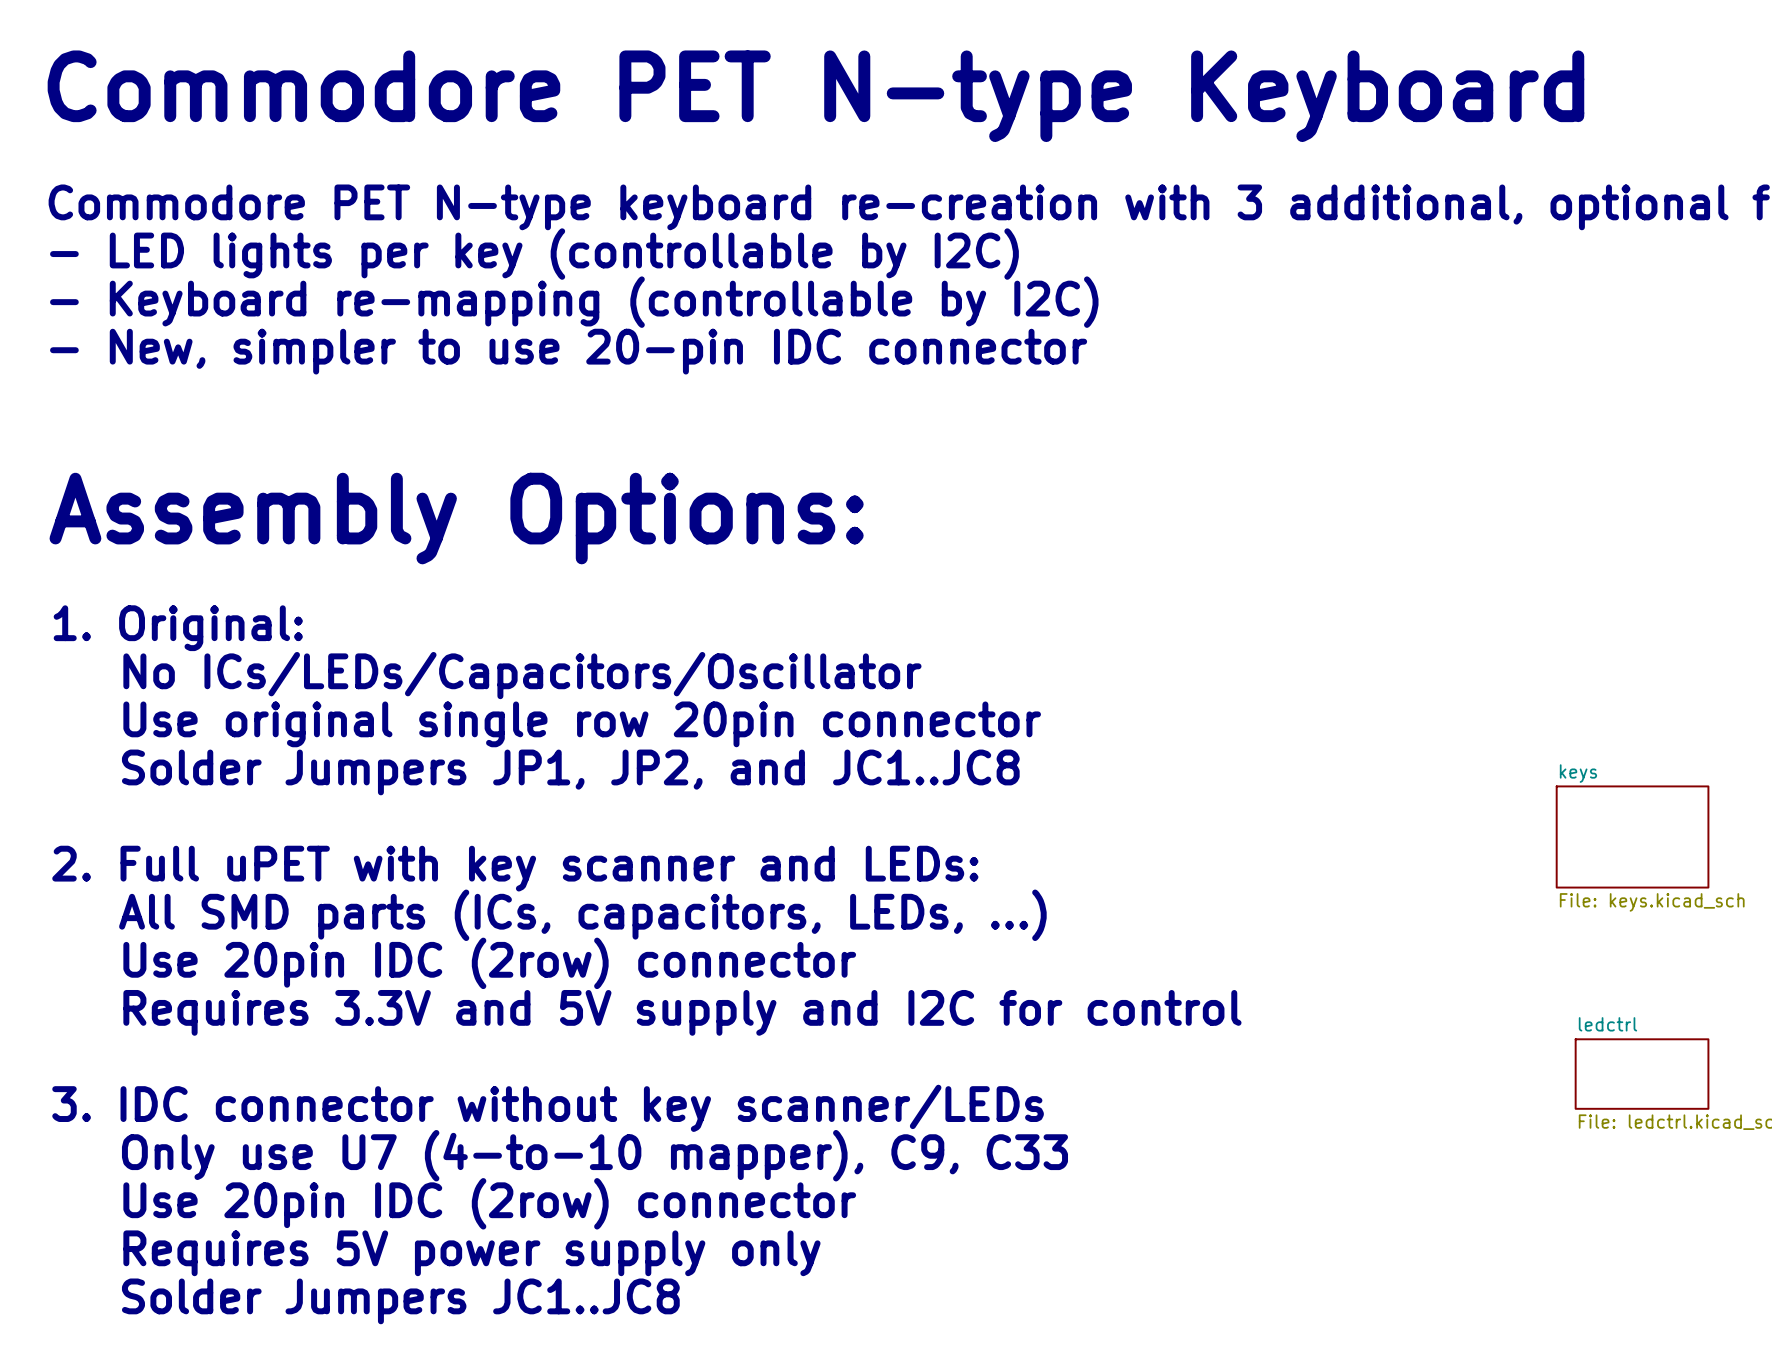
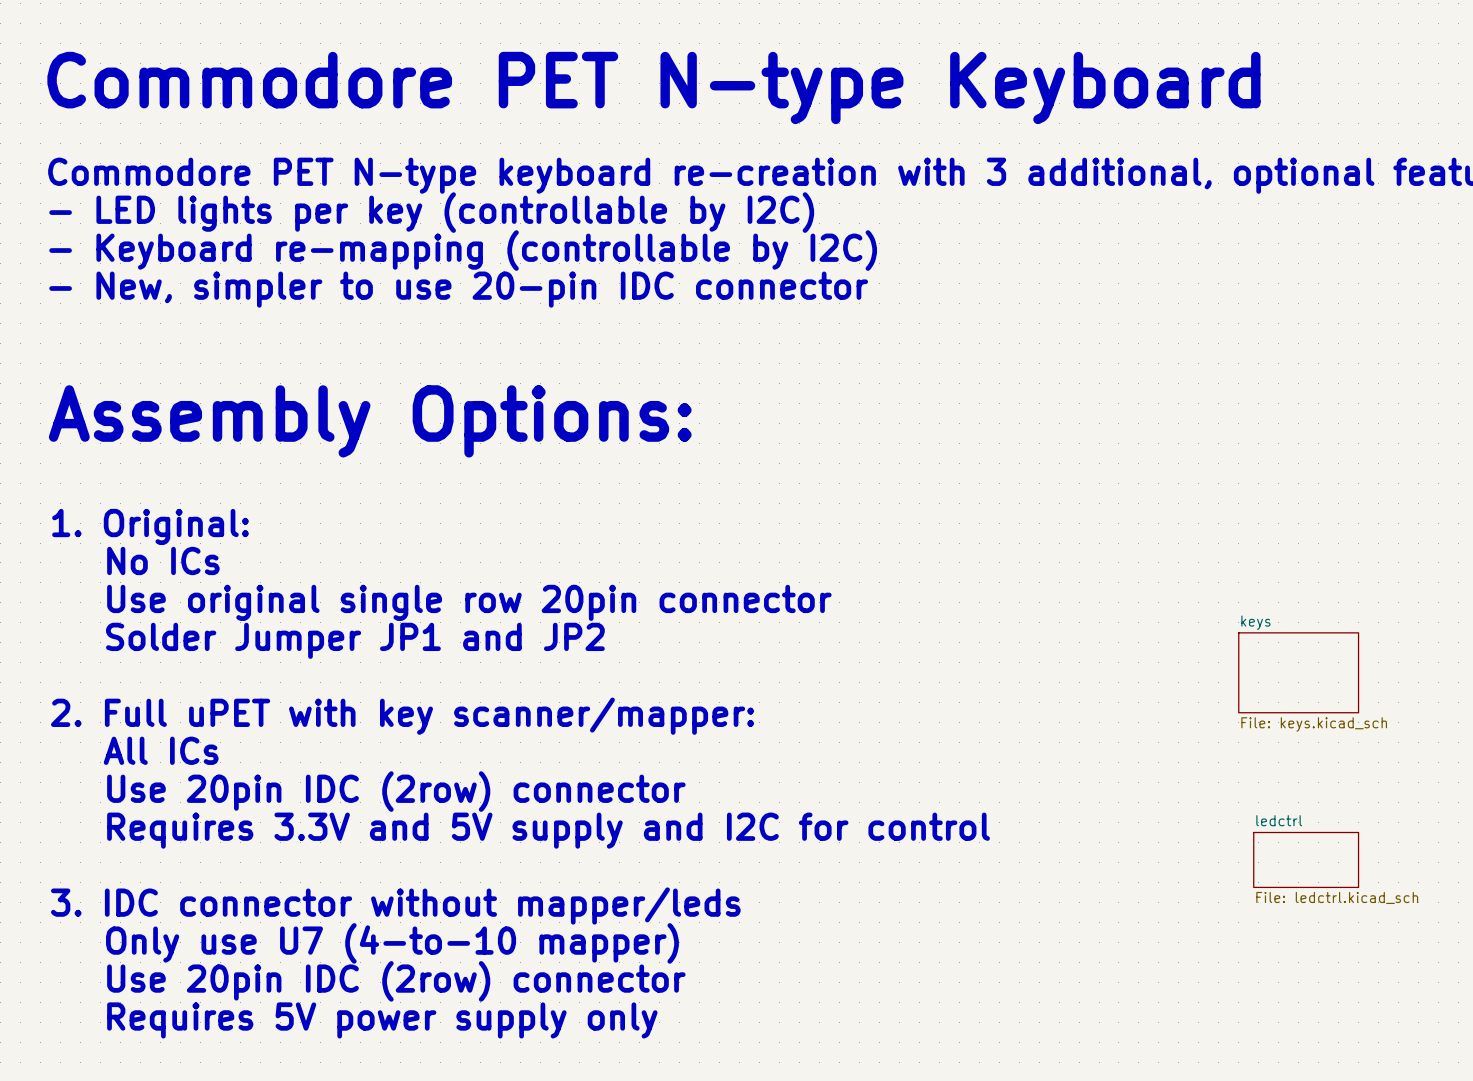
text position: 1. Original: (178, 628) -> 1. Original: (150, 526)
text: No ICs/LEDs/Capacitors/Oscillator (522, 675) -> none
text: none -> No ICs (163, 560)
text position: Use original single row 20pin connector (582, 724) -> Use original single row 20pin connector (469, 602)
text: Solder Jumpers JP1, JP2, and JC1..JC8 (570, 772) -> Solder Jumper JP1 and JP2 (355, 640)
text: 2. Full uPET with key scanner and LEDs: (515, 868) -> 2. Full uPET with key scanner/mapper: (402, 716)
text: All SMD parts (ICs, capacitors, LEDs, ...) (582, 915) -> none
text: none -> All ICs (161, 750)
text position: Use 20pin IDC (2row) connector (489, 963) -> Use 20pin IDC (2row) connector (396, 791)
text position: Requires 3.3V and 5V supply and I2C for control (682, 1012) -> Requires 3.3V and 5V supply and I2C for control (548, 830)
text: 3. IDC connector without key scanner/LEDs (548, 1108) -> 3. IDC connector without mapper/leds (395, 906)
text: Only use U7 (4-to-10 mapper), C9, C33 (594, 1155) -> Only use U7 (4-to-10 mapper) (392, 943)
text position: Use 20pin IDC (2row) connector (489, 1203) -> Use 20pin IDC (2row) connector (396, 981)
text position: Requires 5V power supply only (471, 1253) -> Requires 5V power supply only (382, 1020)
text: Solder Jumpers JC1..JC8 (400, 1301) -> none

